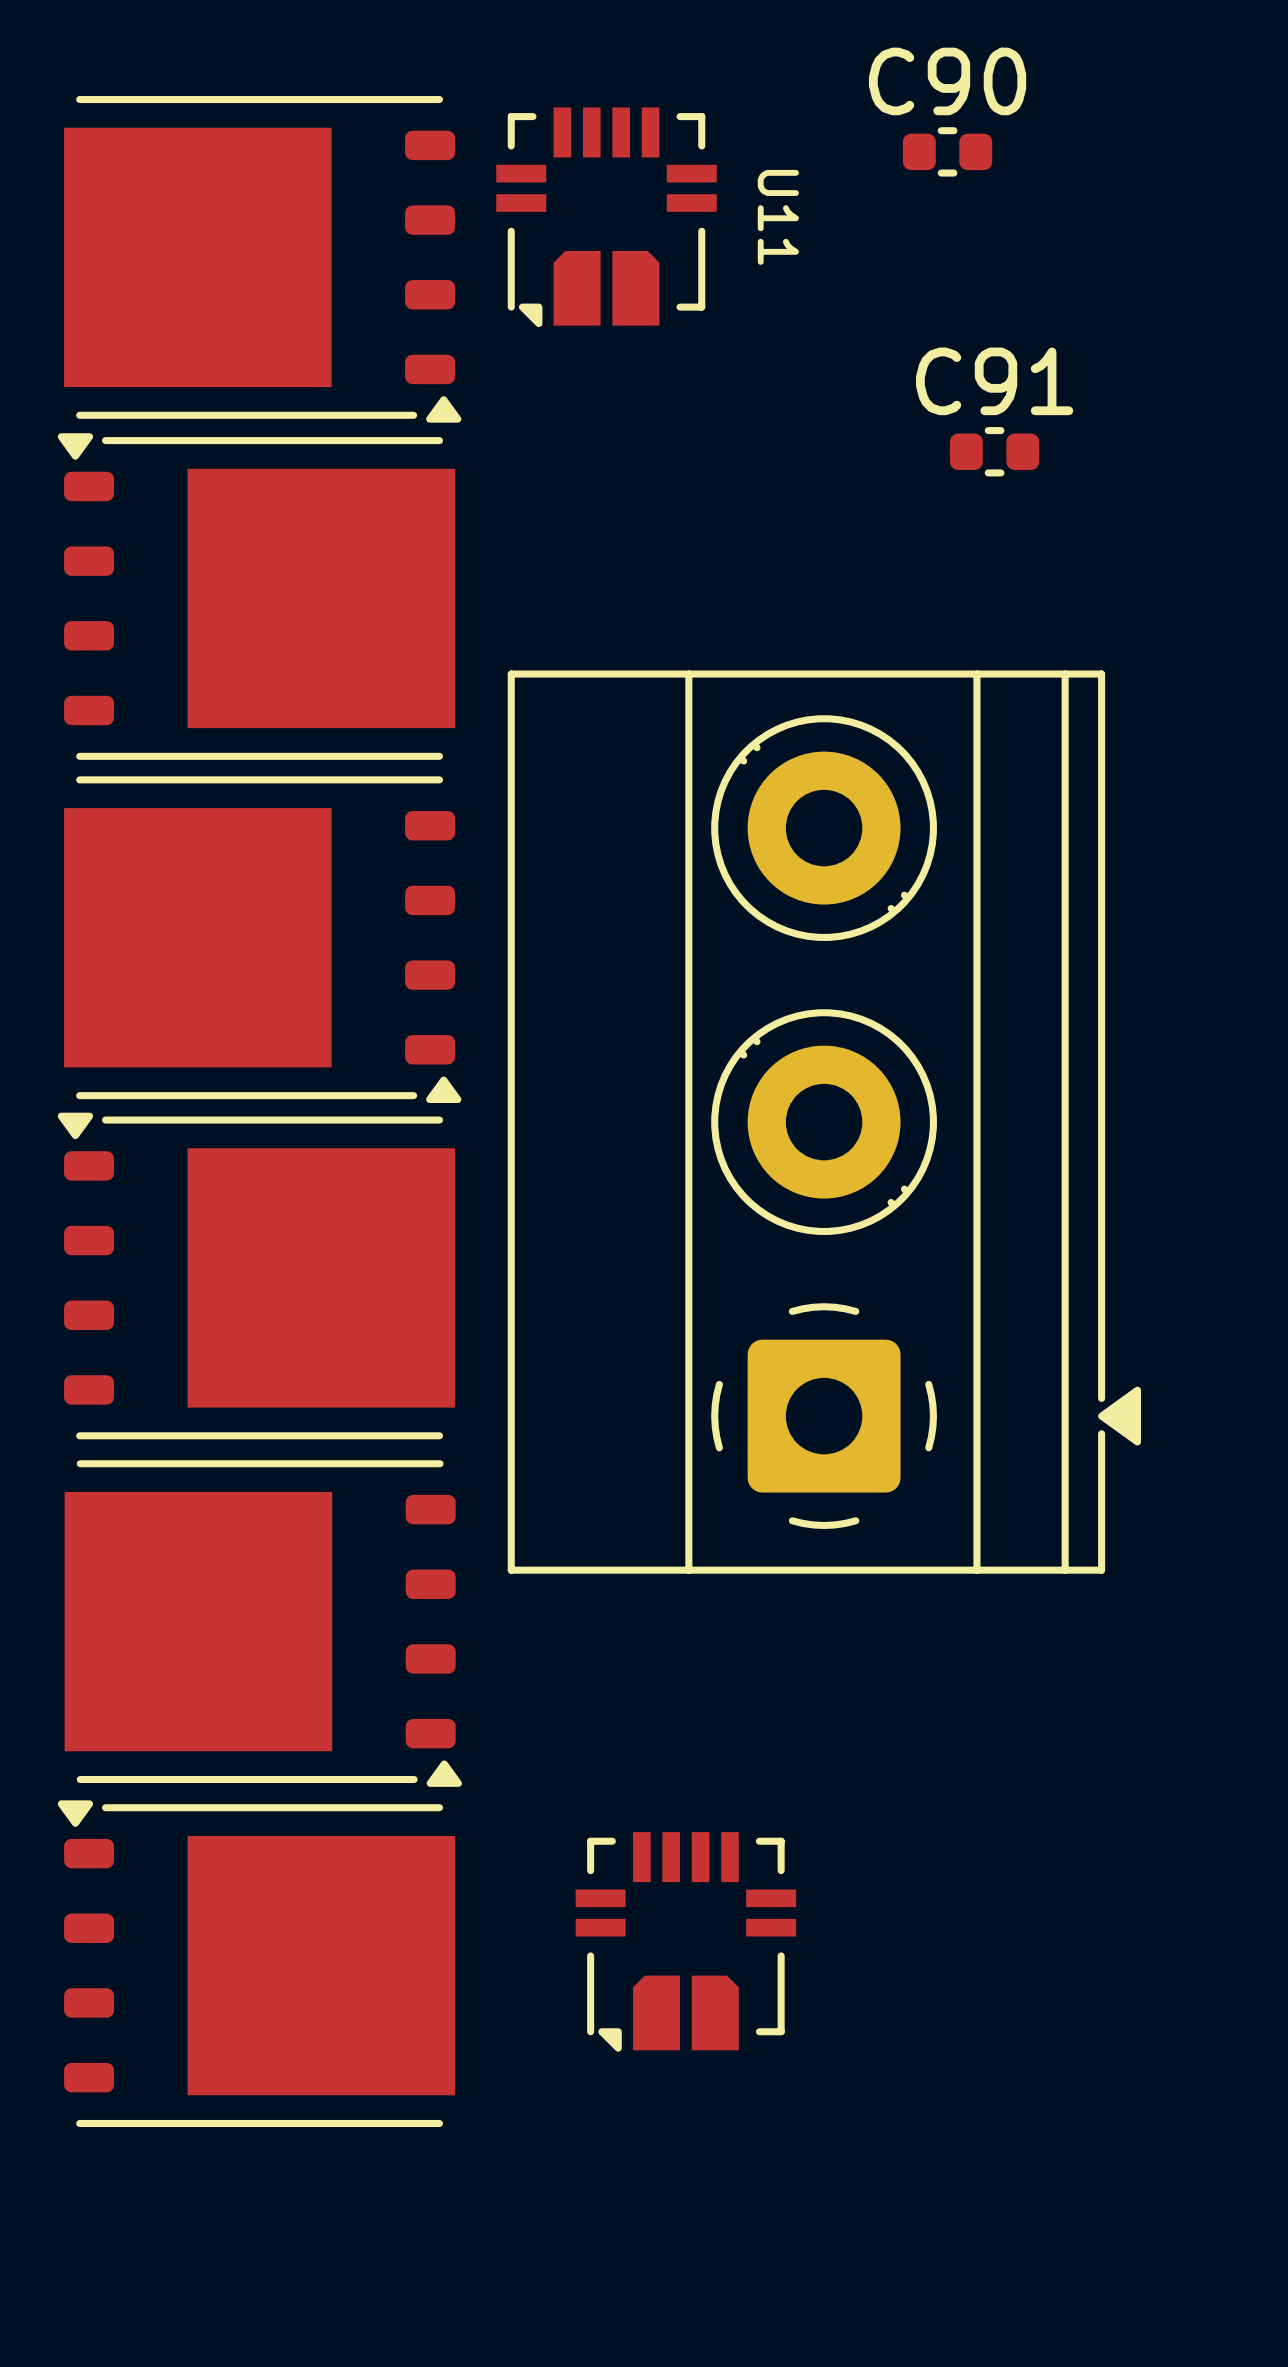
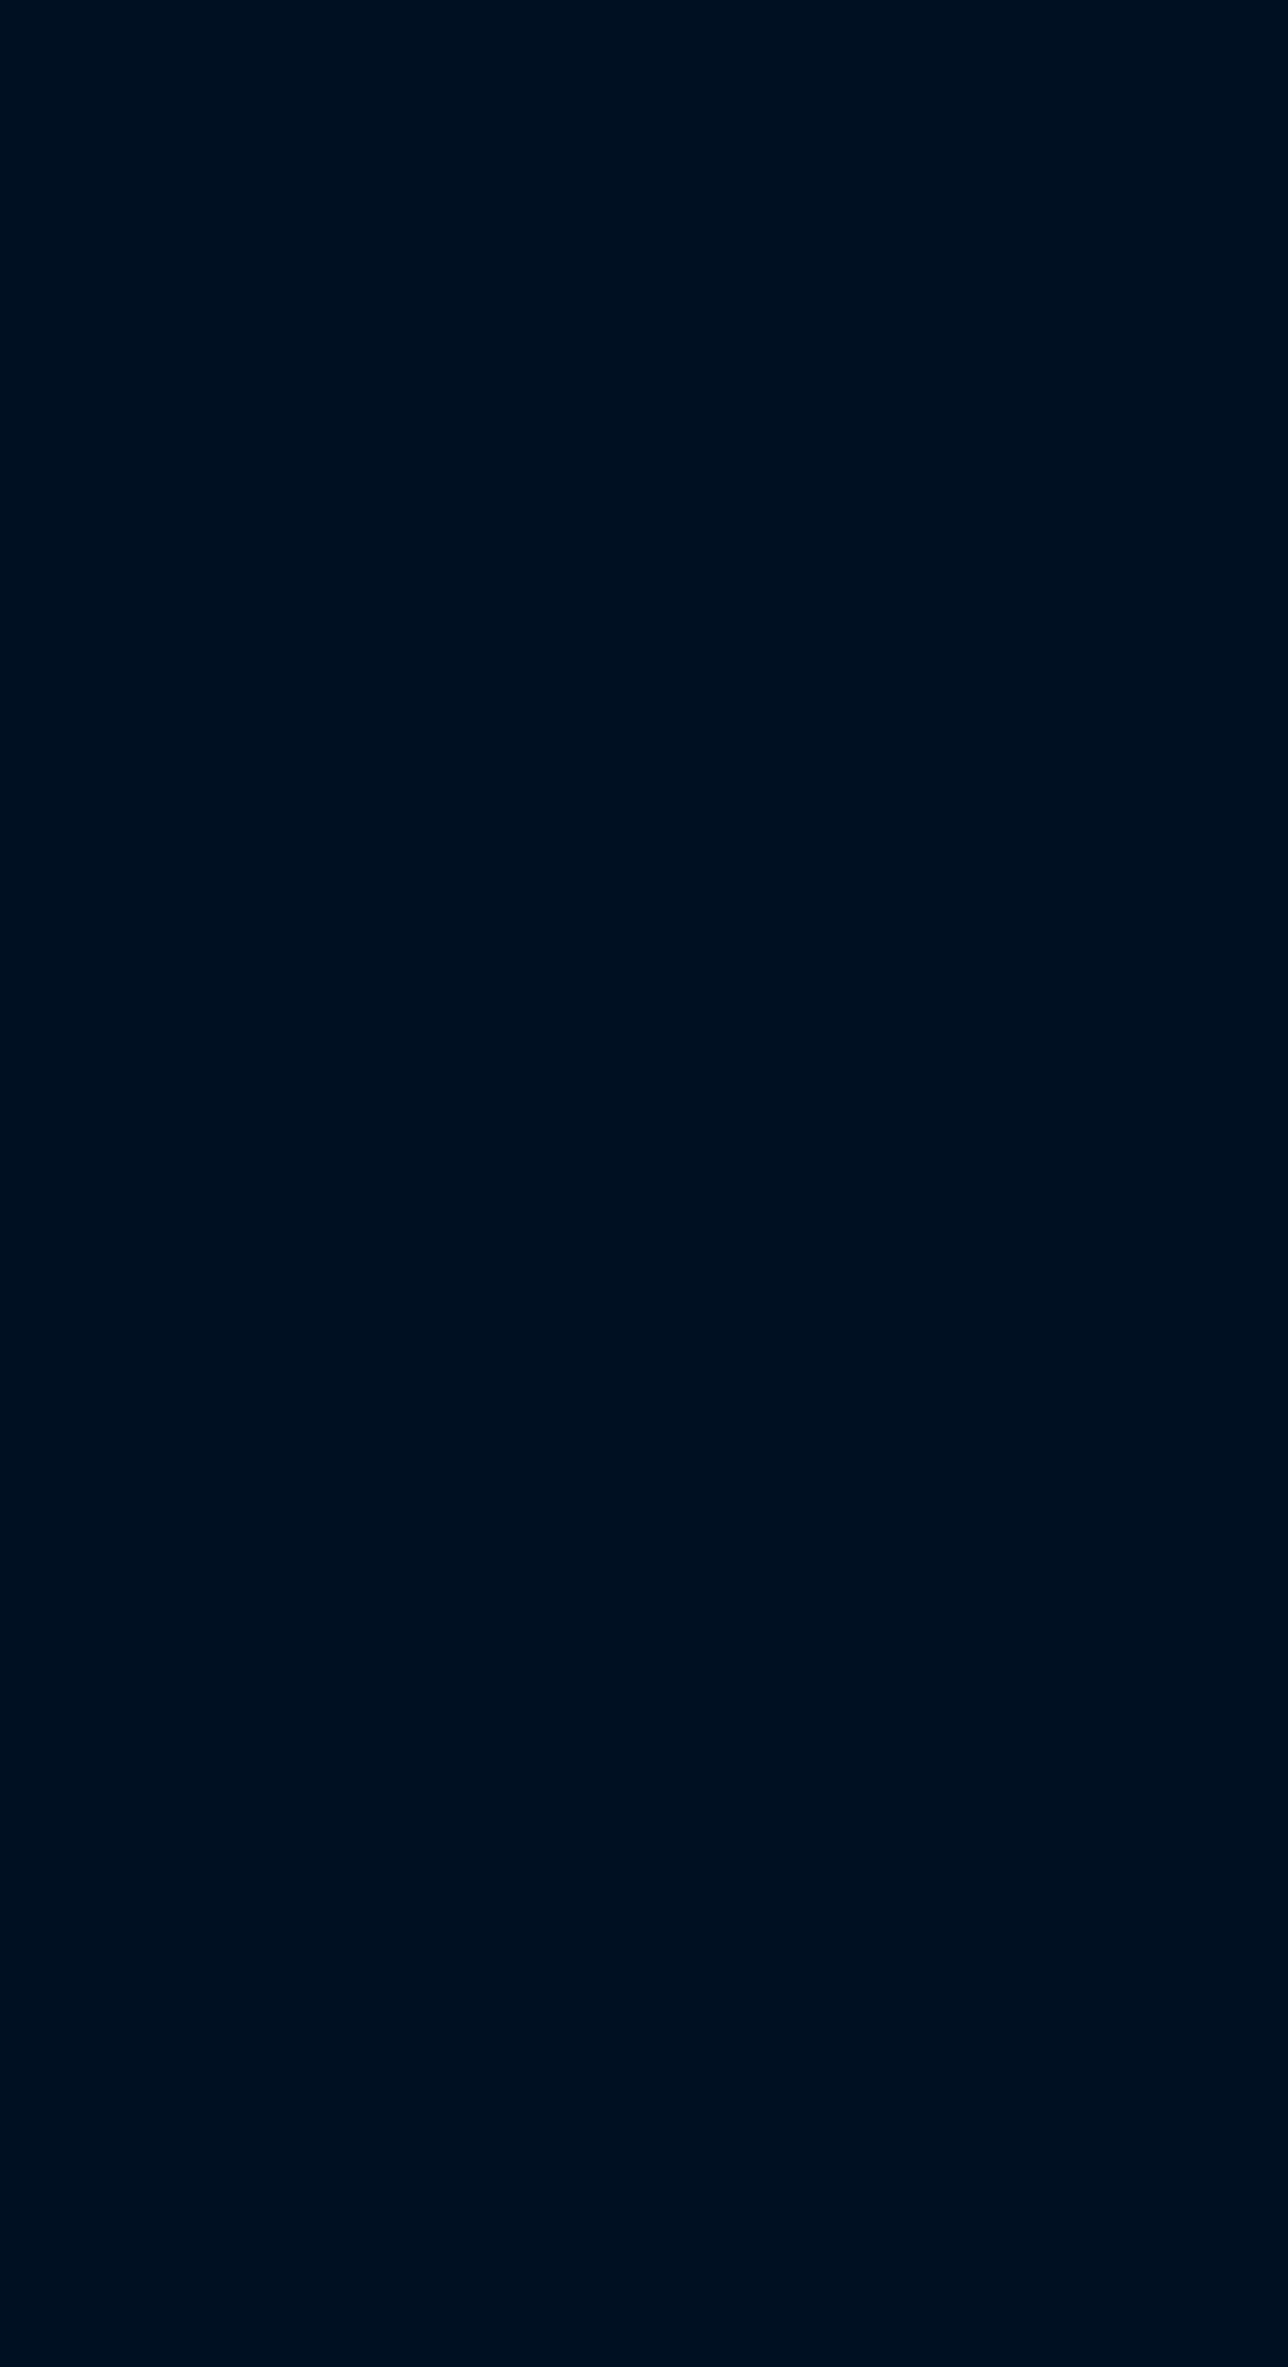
C90: (947, 151) -> none
U11: (606, 217) -> none
part: (262, 259) -> none
C91: (994, 451) -> none
part: (256, 596) -> none
part: (262, 939) -> none
part: (824, 1122) -> none
part: (256, 1276) -> none
part: (263, 1623) -> none
part: (685, 1941) -> none
part: (256, 1963) -> none

